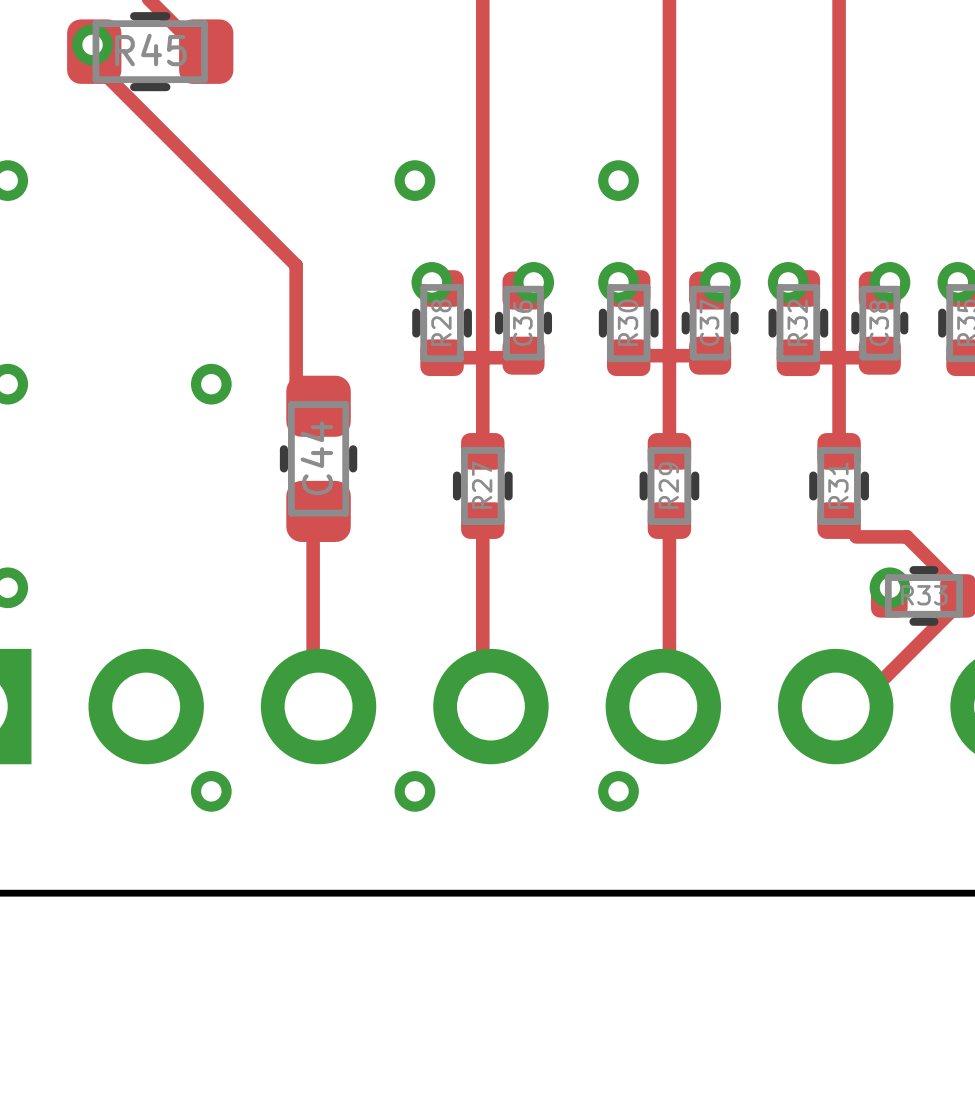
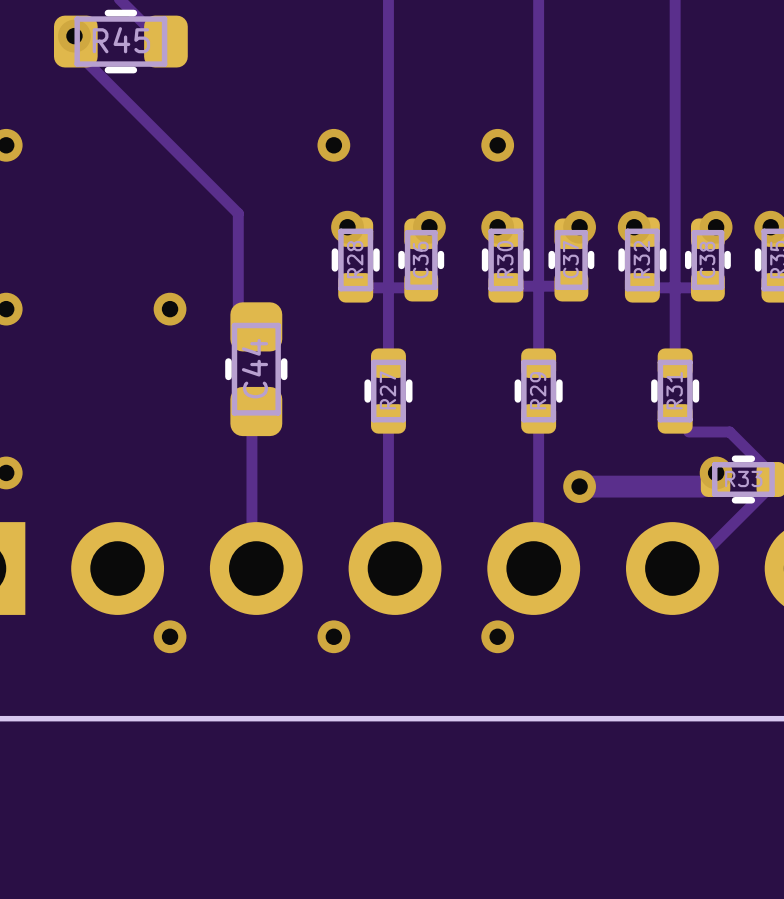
track: none -> (579, 486) (702, 486)
via: none -> (579, 486)

